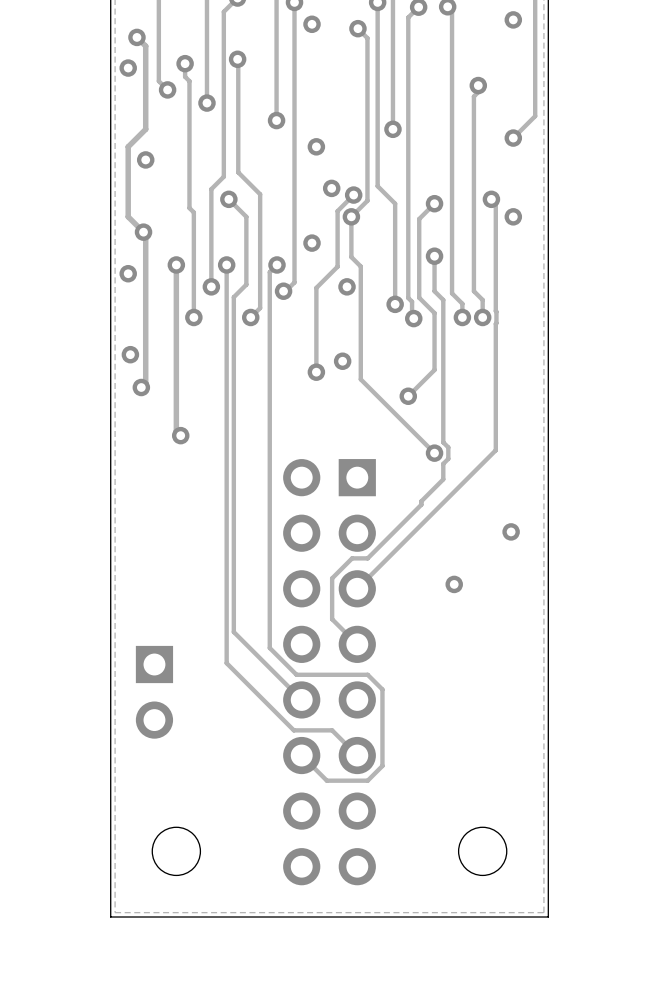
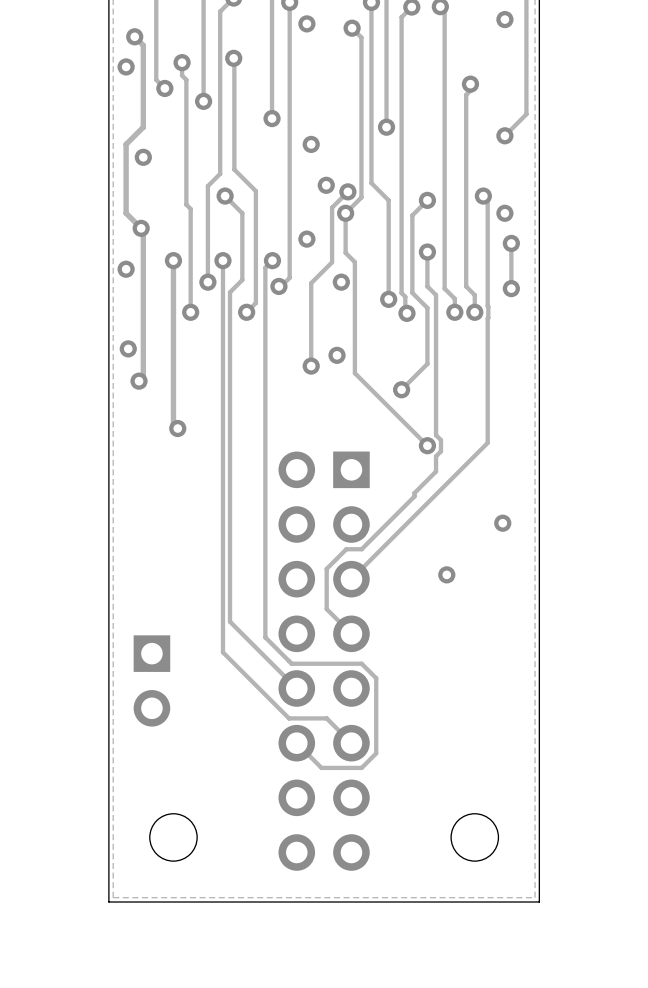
track: none -> (511, 243) (511, 288)
via: none -> (511, 243)
via: none -> (511, 288)

